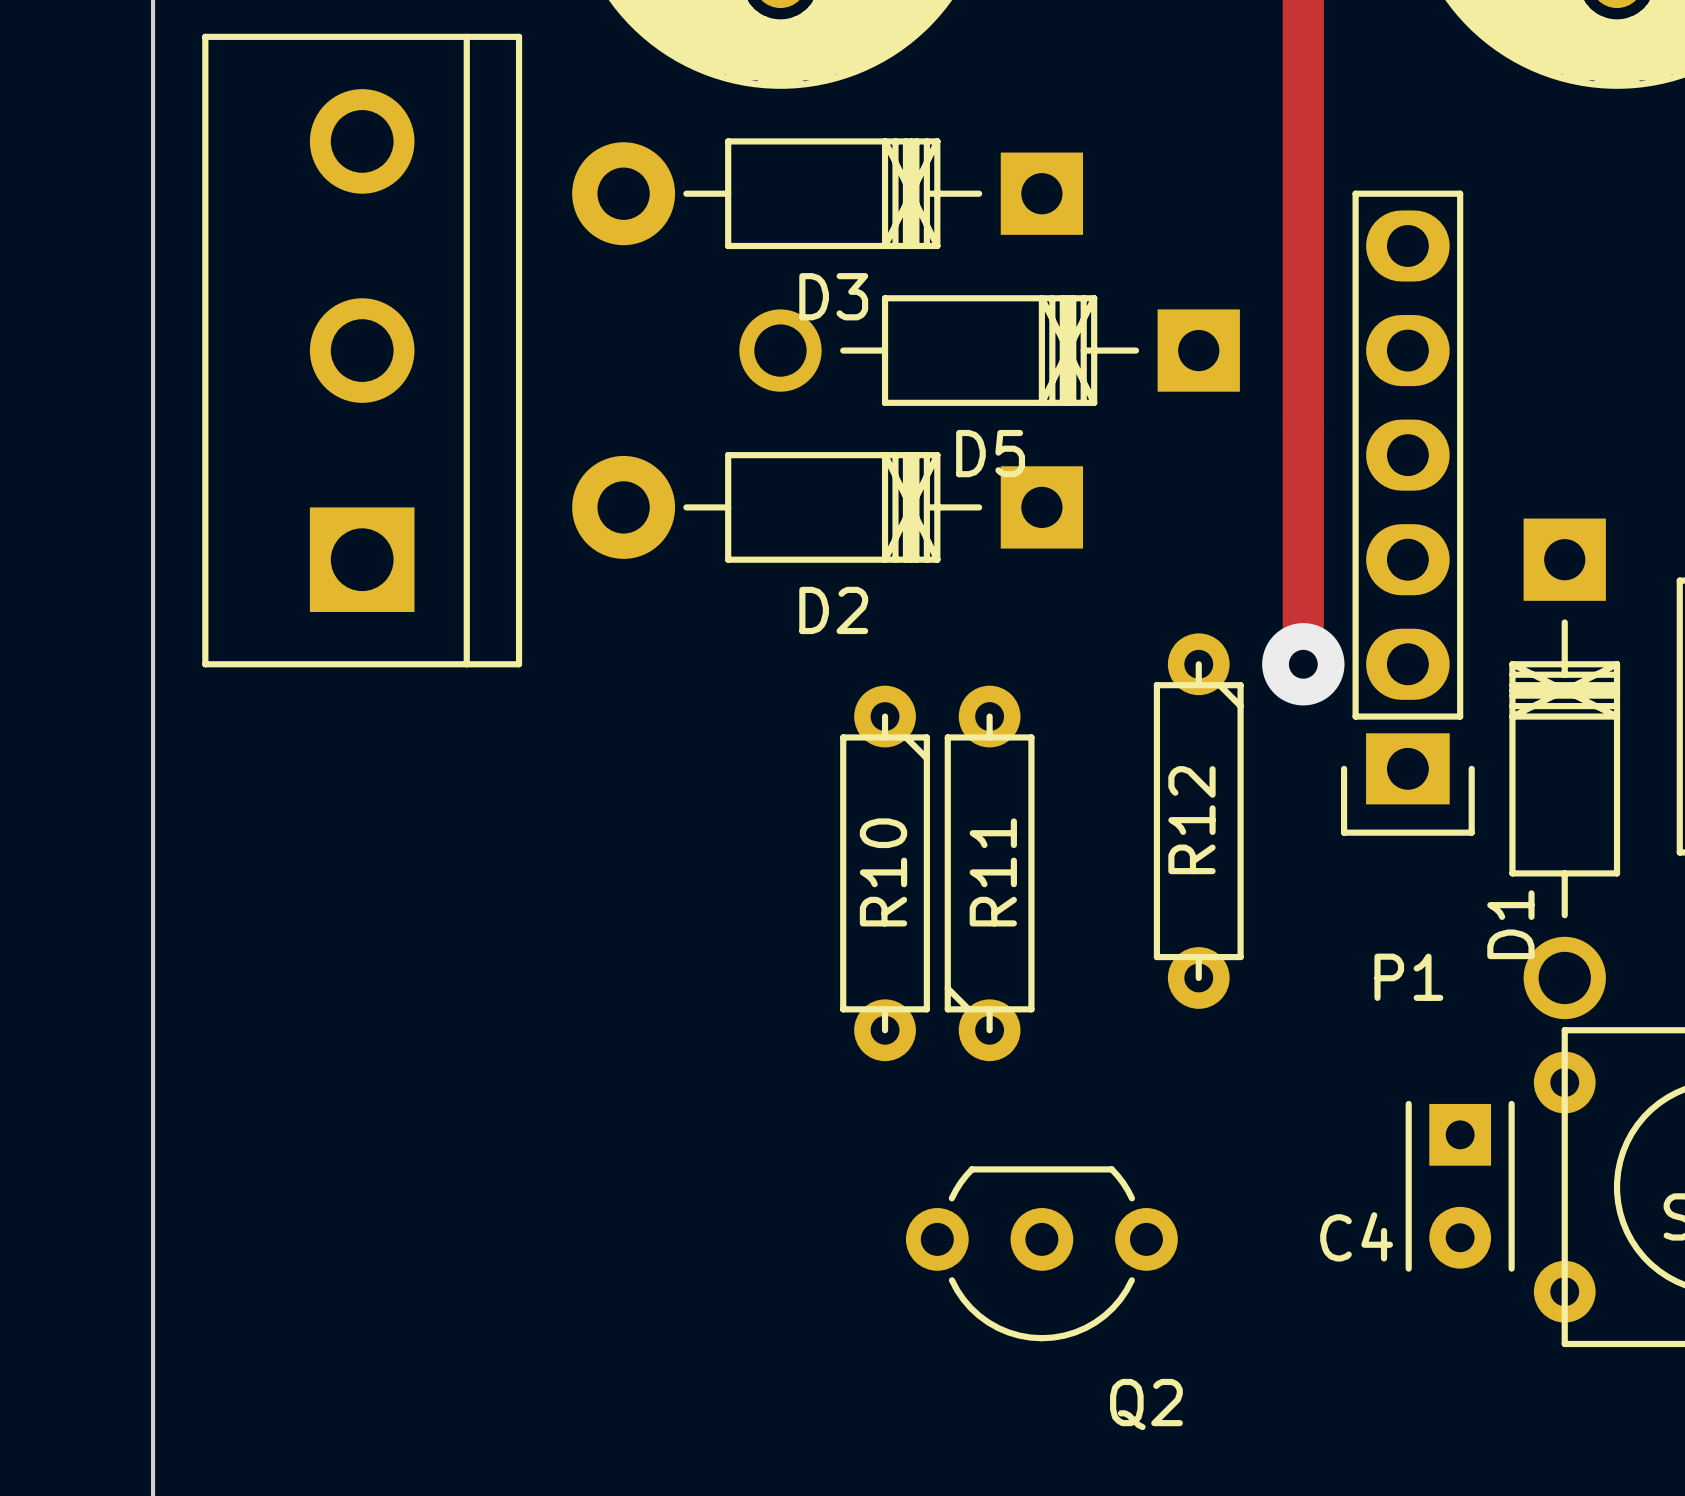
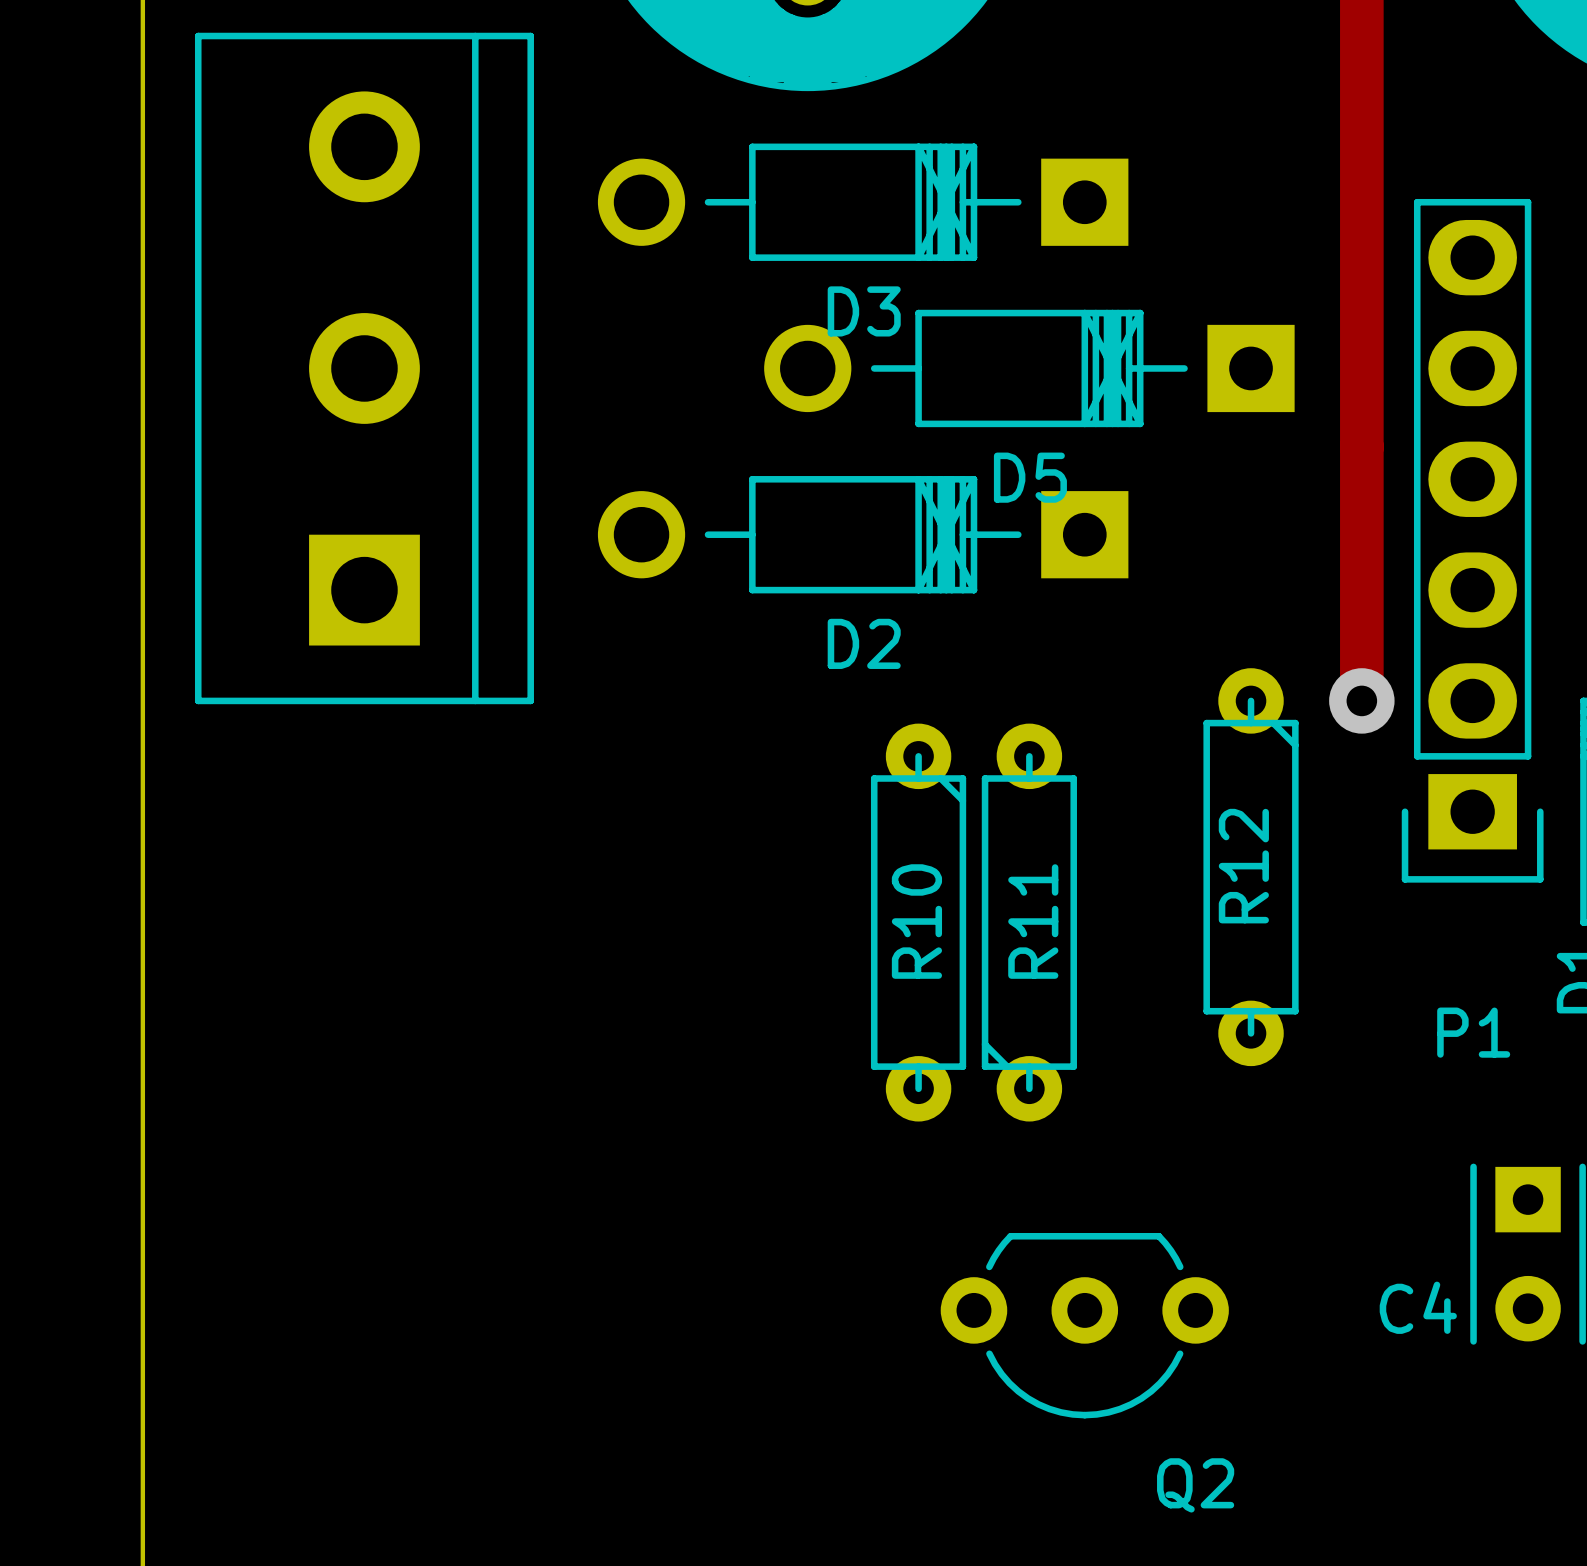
D3 footprint: [572, 138, 1084, 250] -> [597, 143, 1129, 261]
D2 footprint: [572, 452, 1084, 563] -> [597, 476, 1129, 594]
via size: [1262, 623, 1345, 706] -> [1329, 668, 1395, 734]

